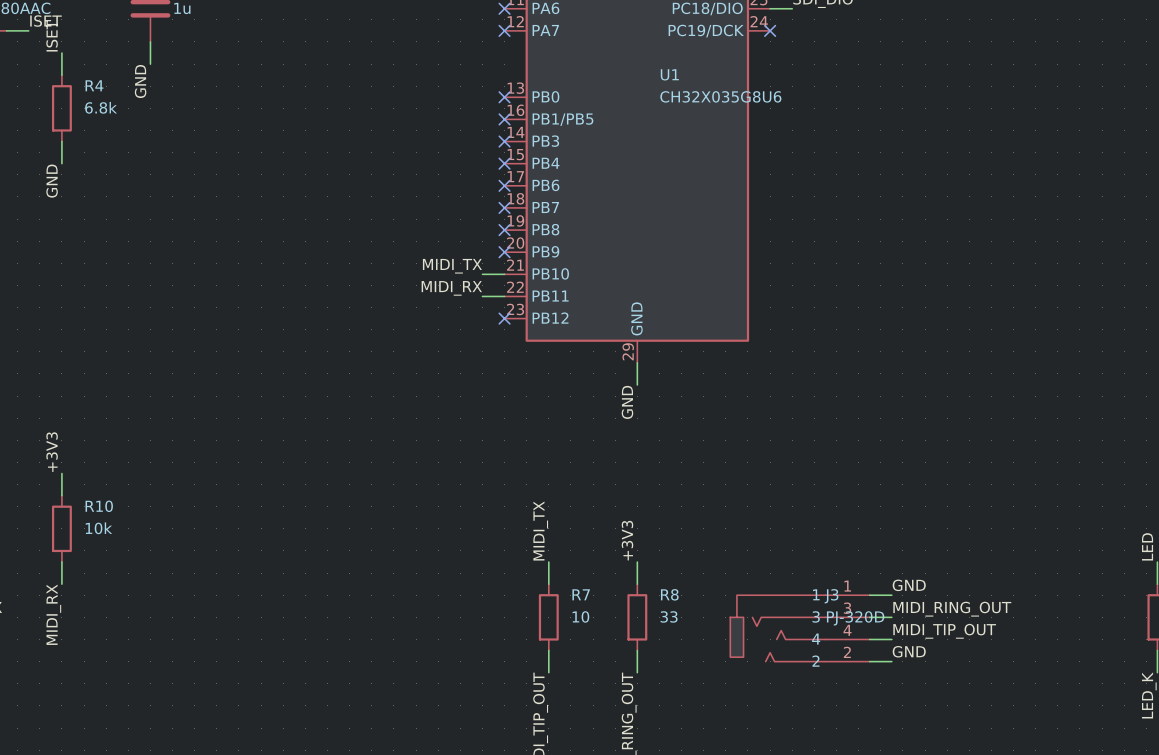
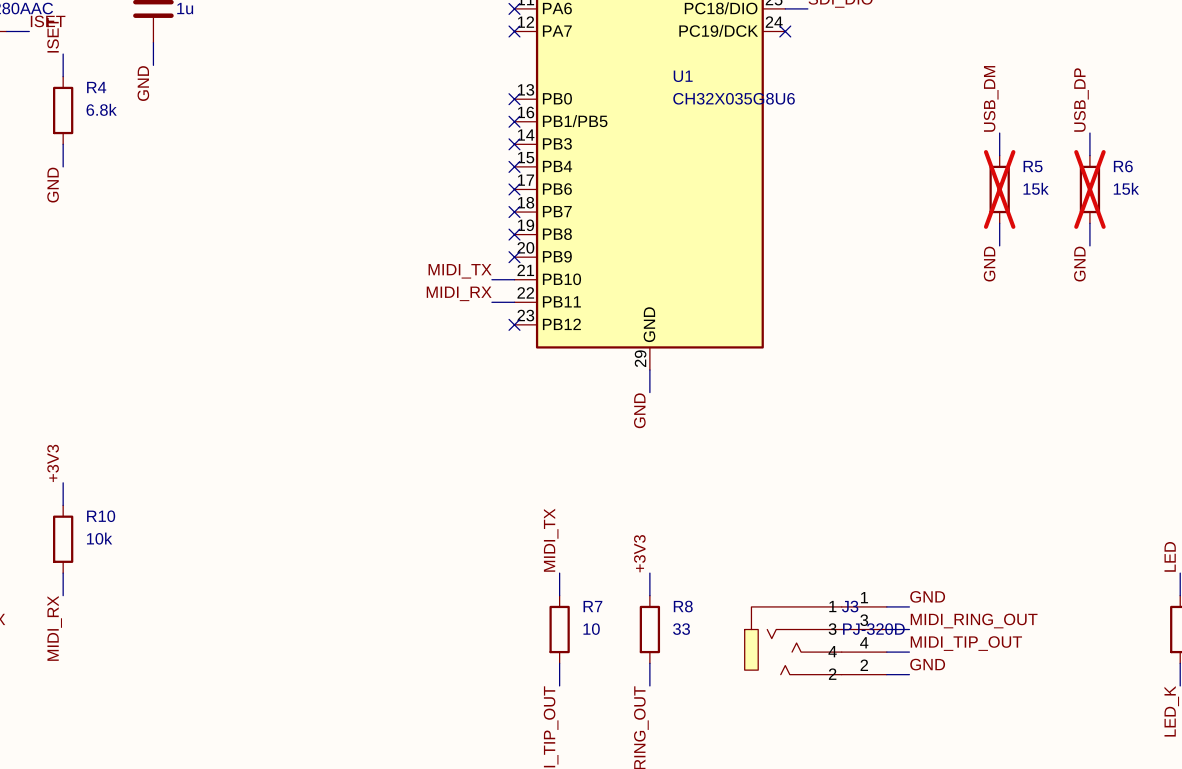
label: none -> USB_DM (991, 98)
label: none -> USB_DP (1081, 100)
wire: none -> (999, 133) (999, 155)
wire: none -> (1089, 133) (1089, 155)
R5: none -> 15k (999, 189)
R6: none -> 15k (1089, 189)
wire: none -> (999, 223) (999, 245)
wire: none -> (1089, 223) (1089, 245)
label: none -> GND (989, 264)
label: none -> GND (1079, 264)

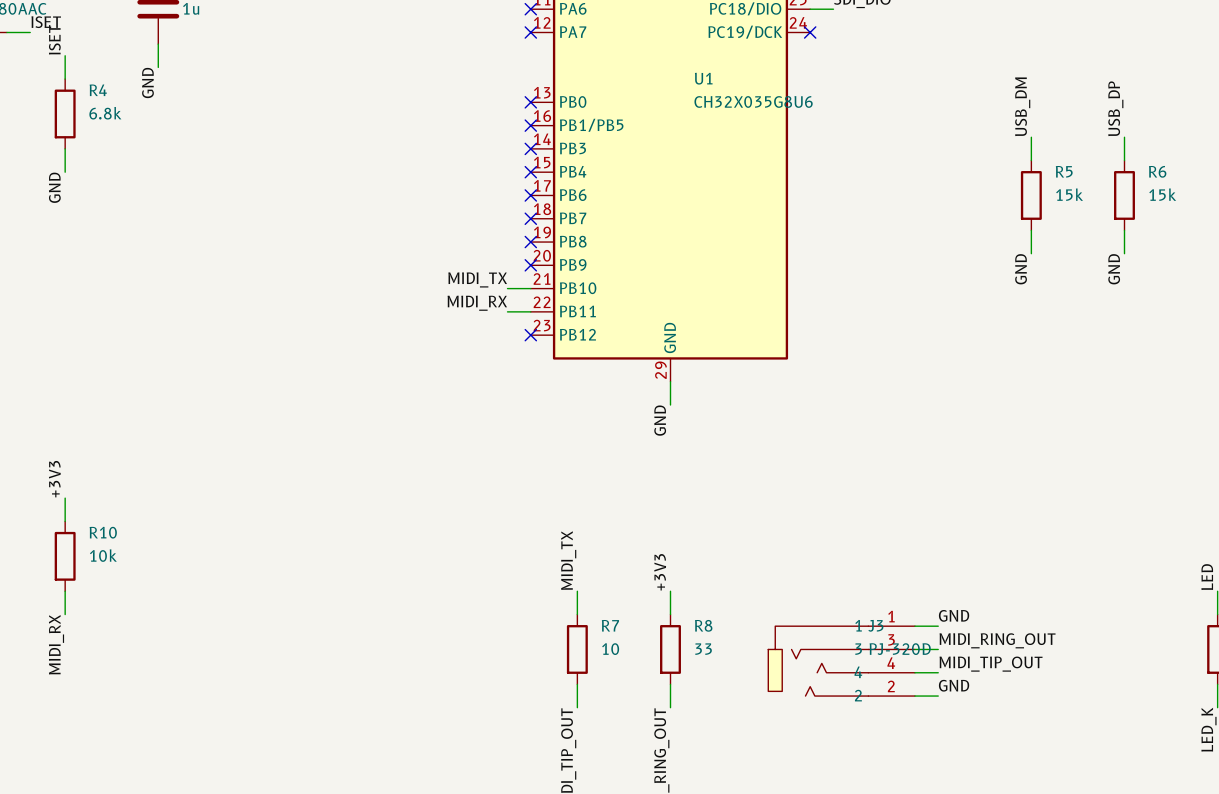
R5 do-not-place cross: (999, 189) -> none
R6 do-not-place cross: (1089, 189) -> none

